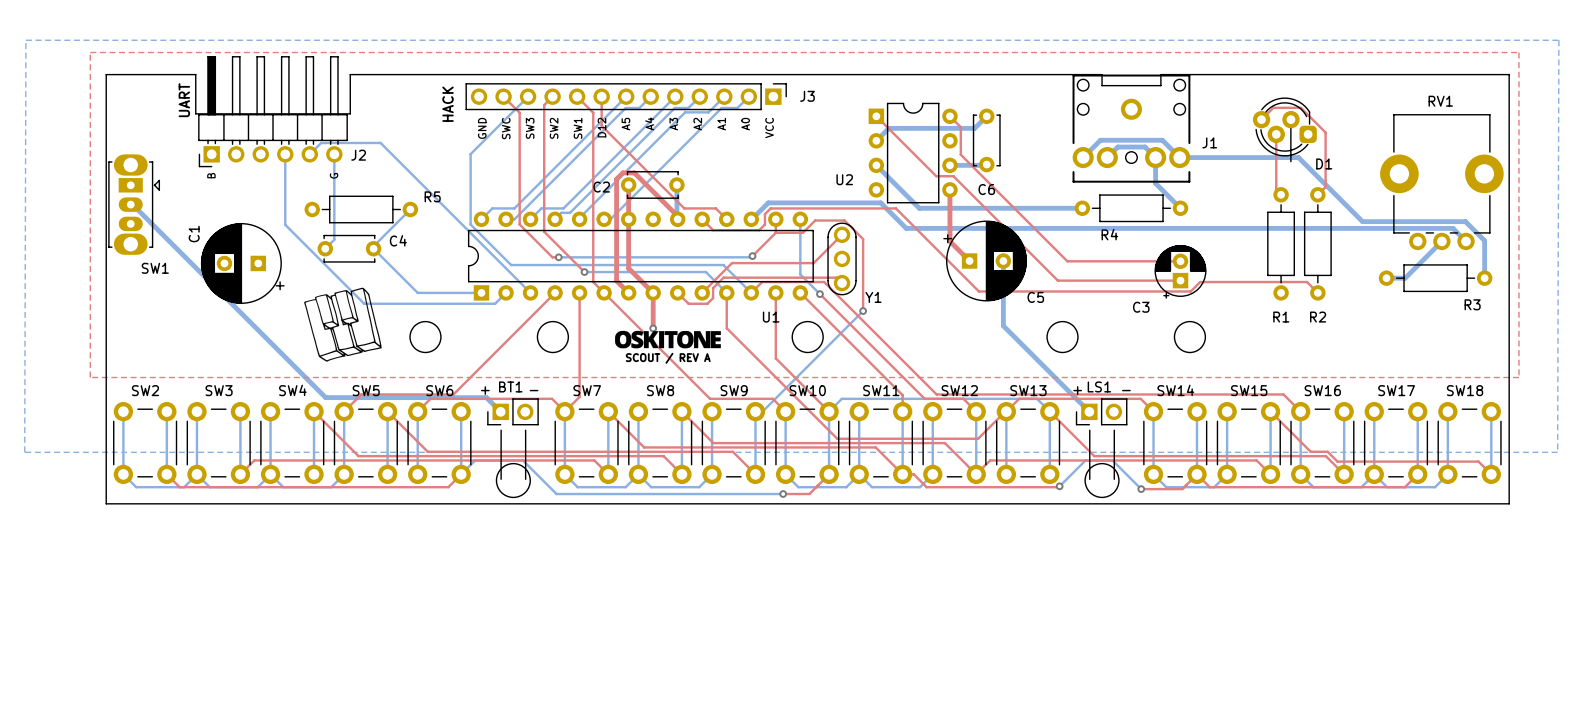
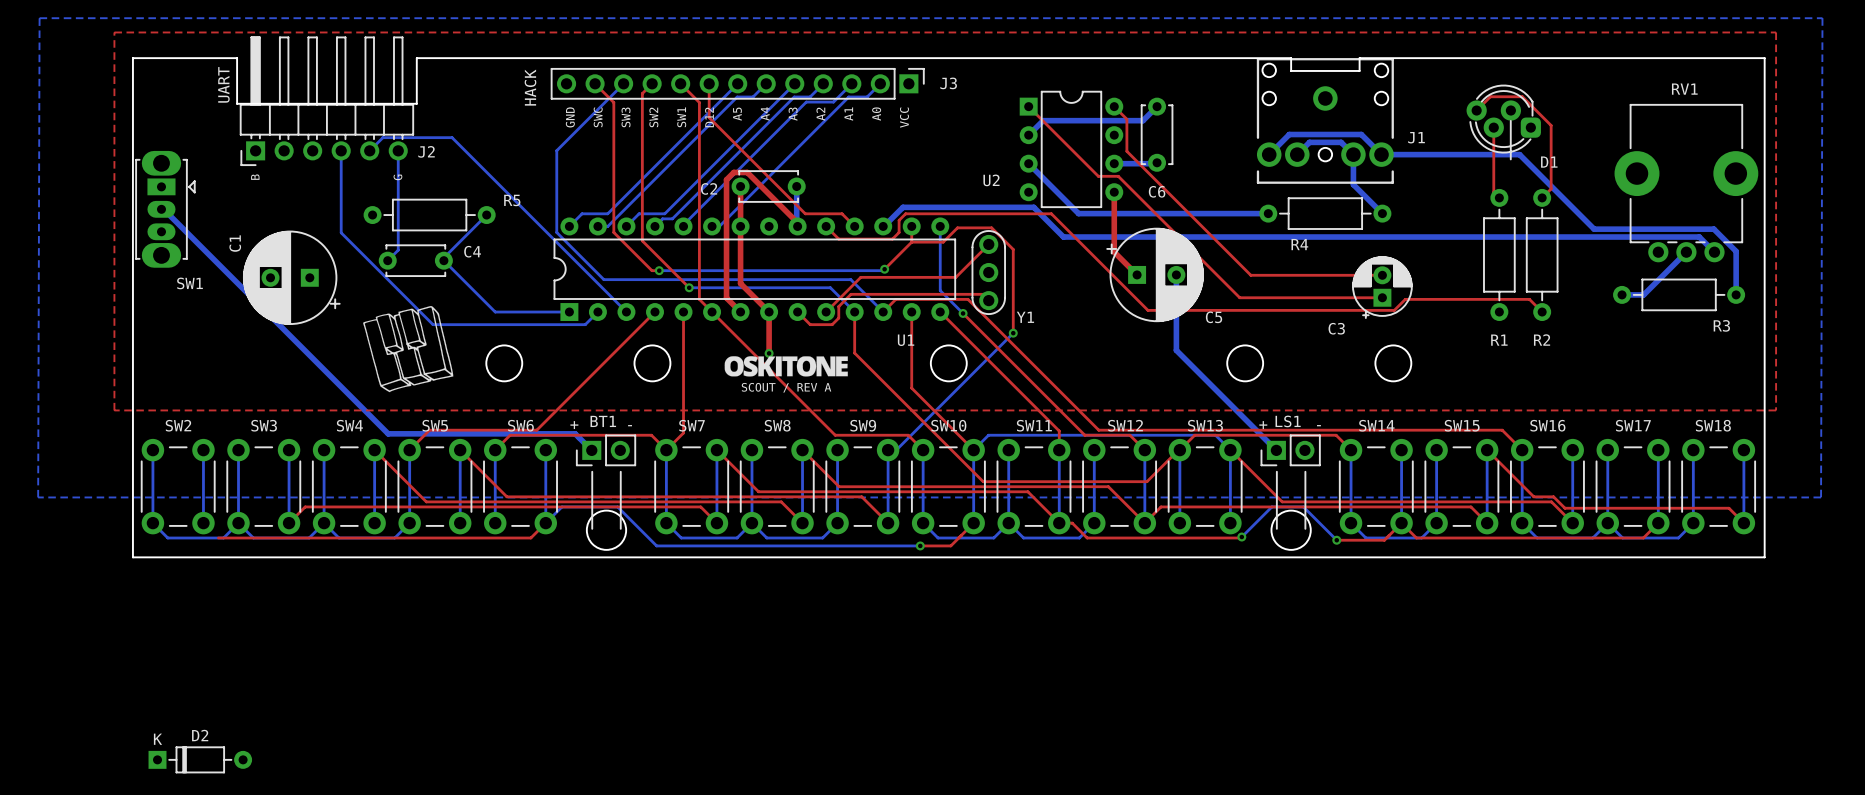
top track: (166, 474) (179, 487) -> none
D2: none -> (200, 759)

